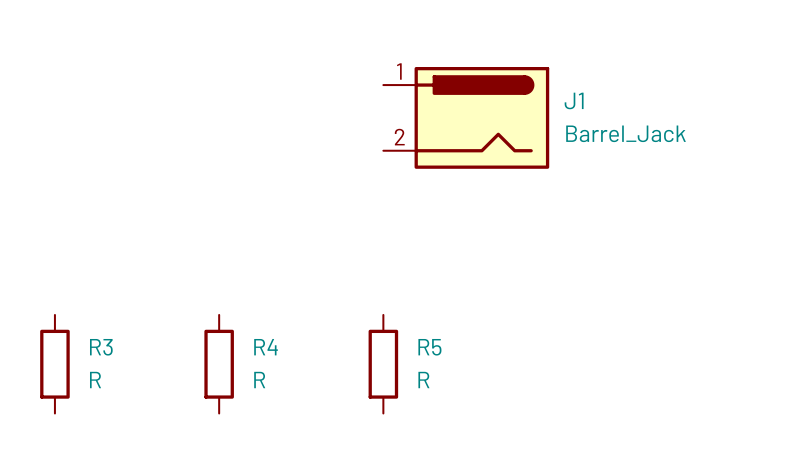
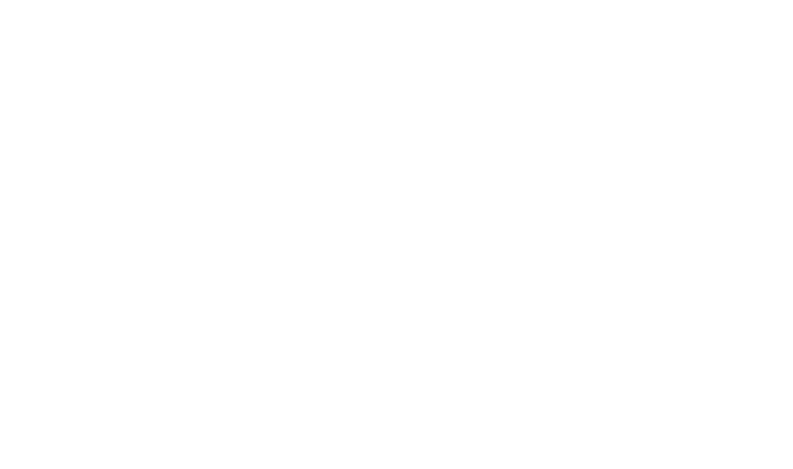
J1: Barrel_Jack (466, 117) -> none
R3: R (54, 364) -> none
R4: R (219, 364) -> none
R5: R (383, 364) -> none

